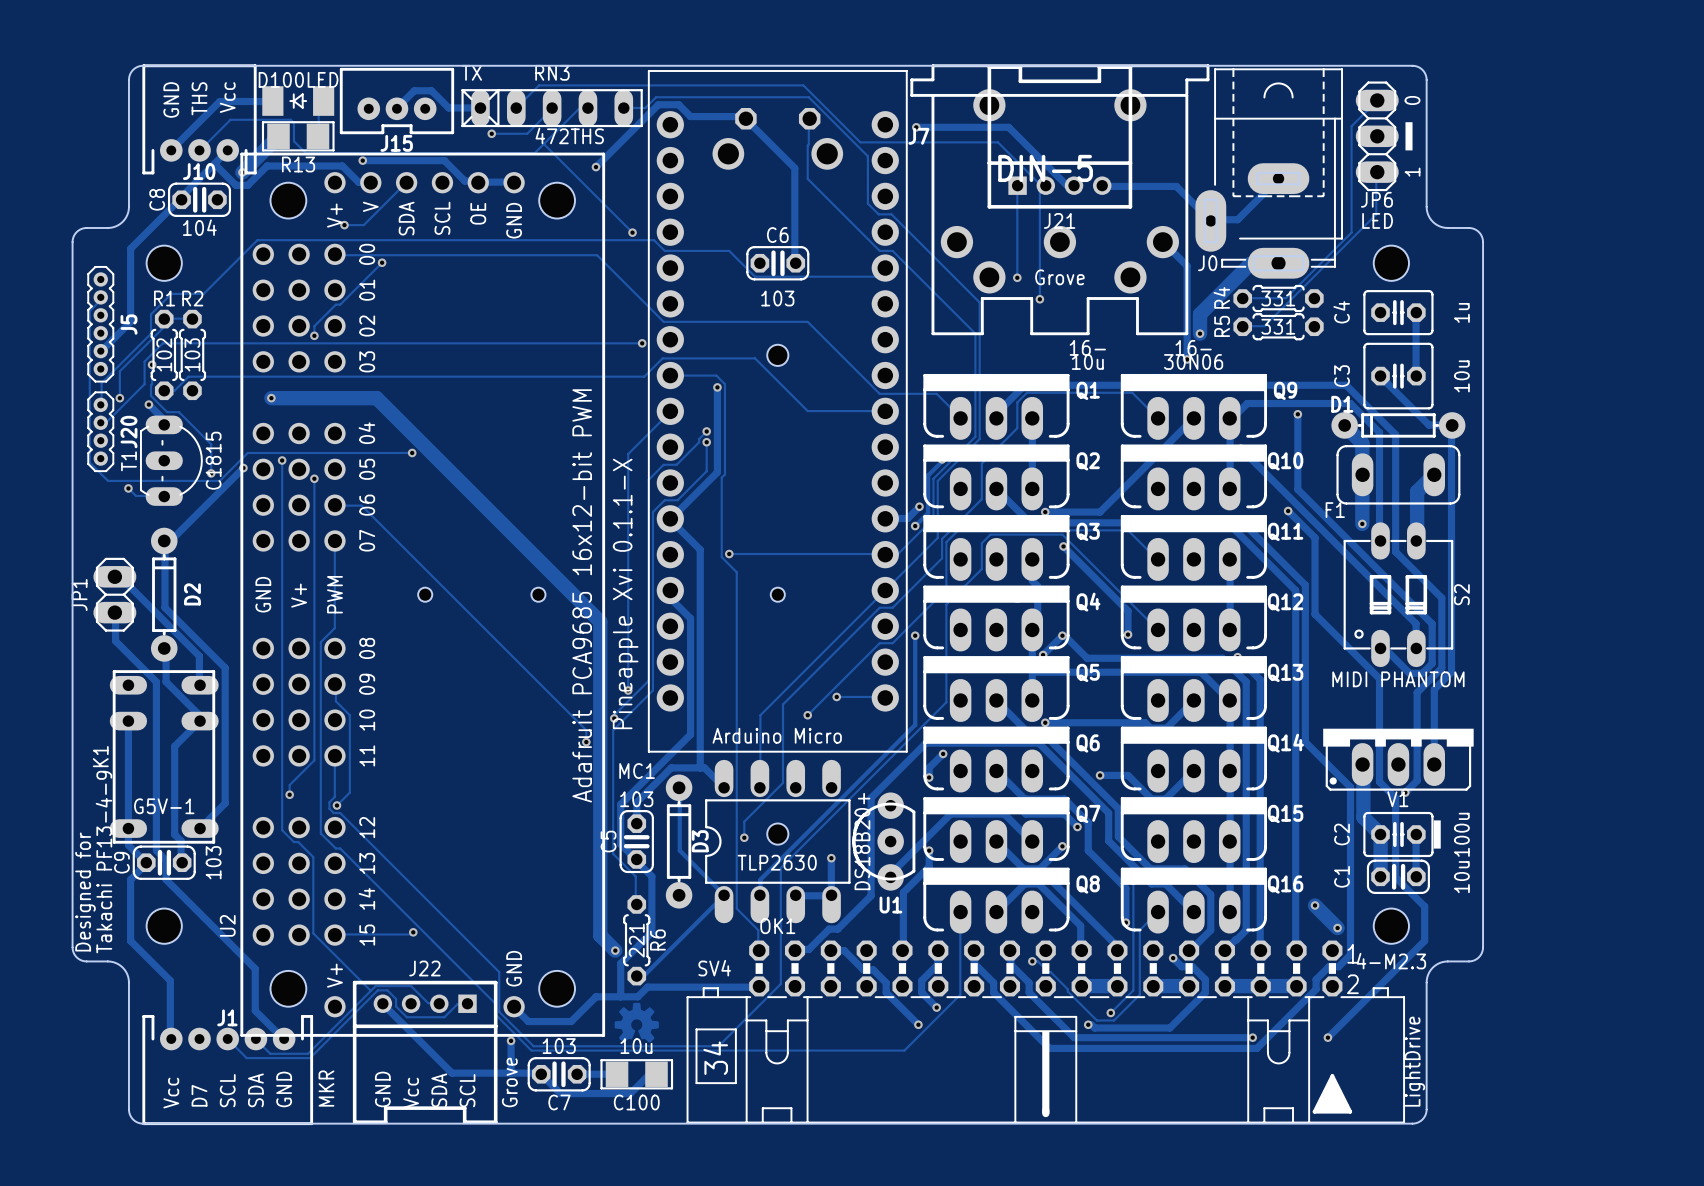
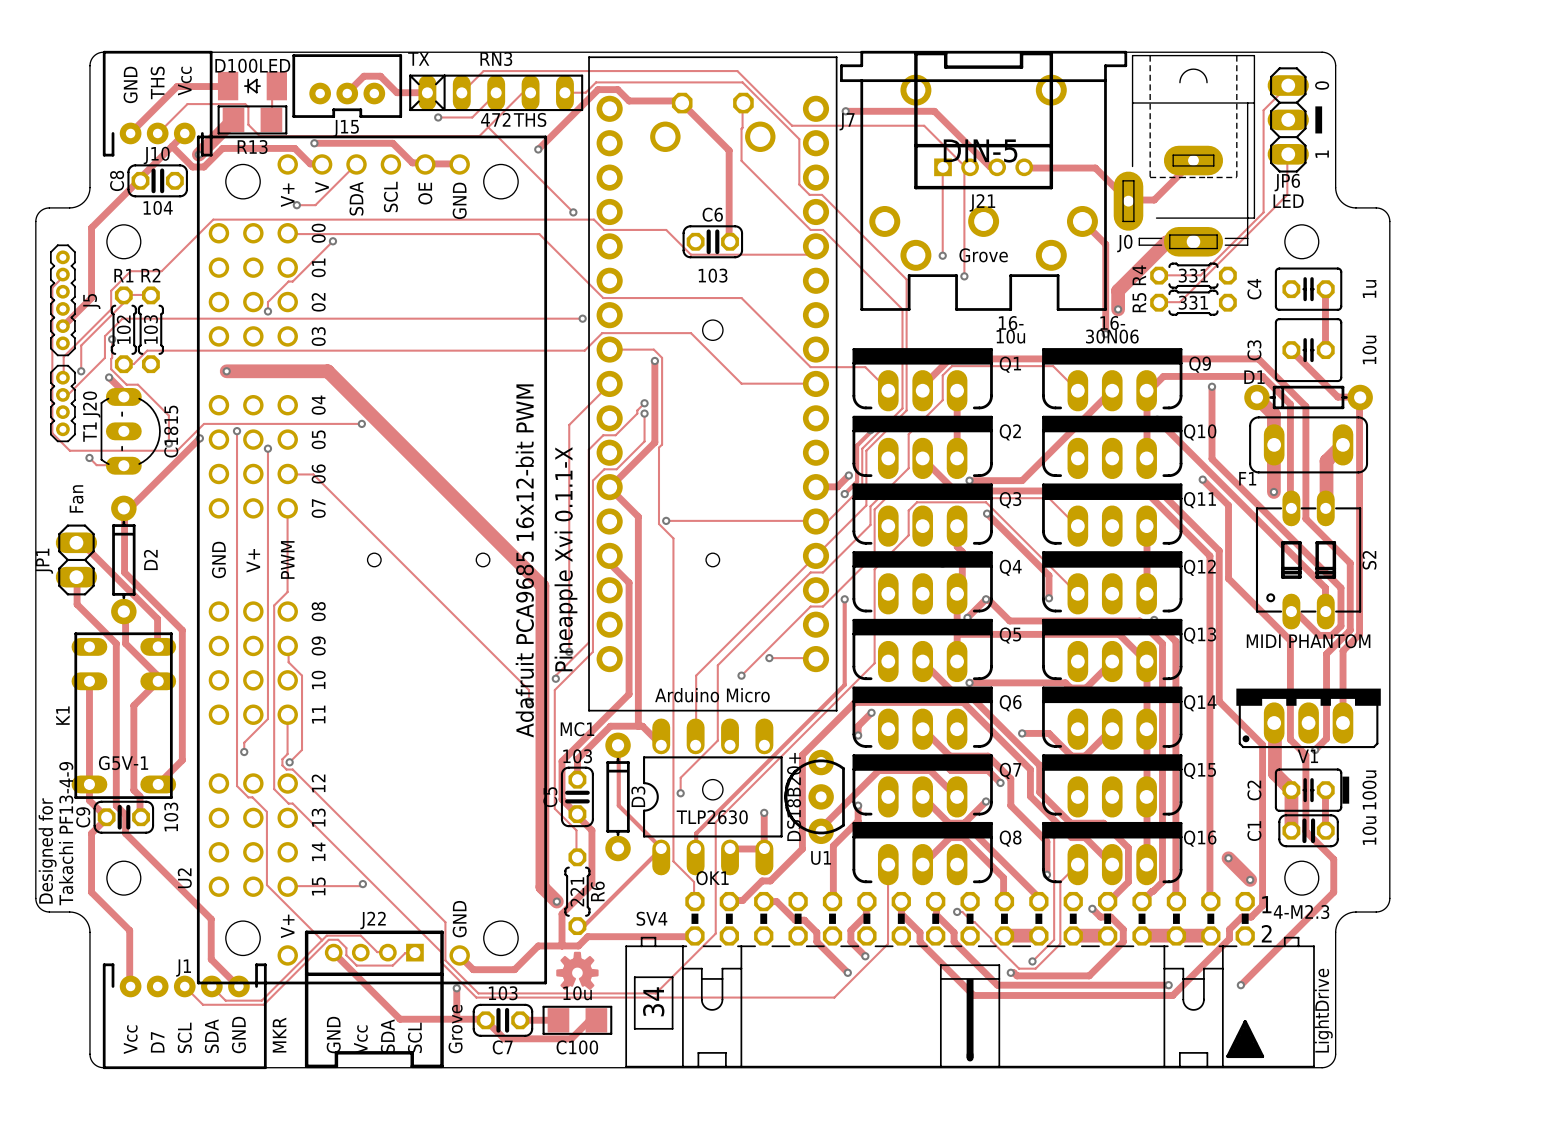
text: none -> Fan (76, 498)

